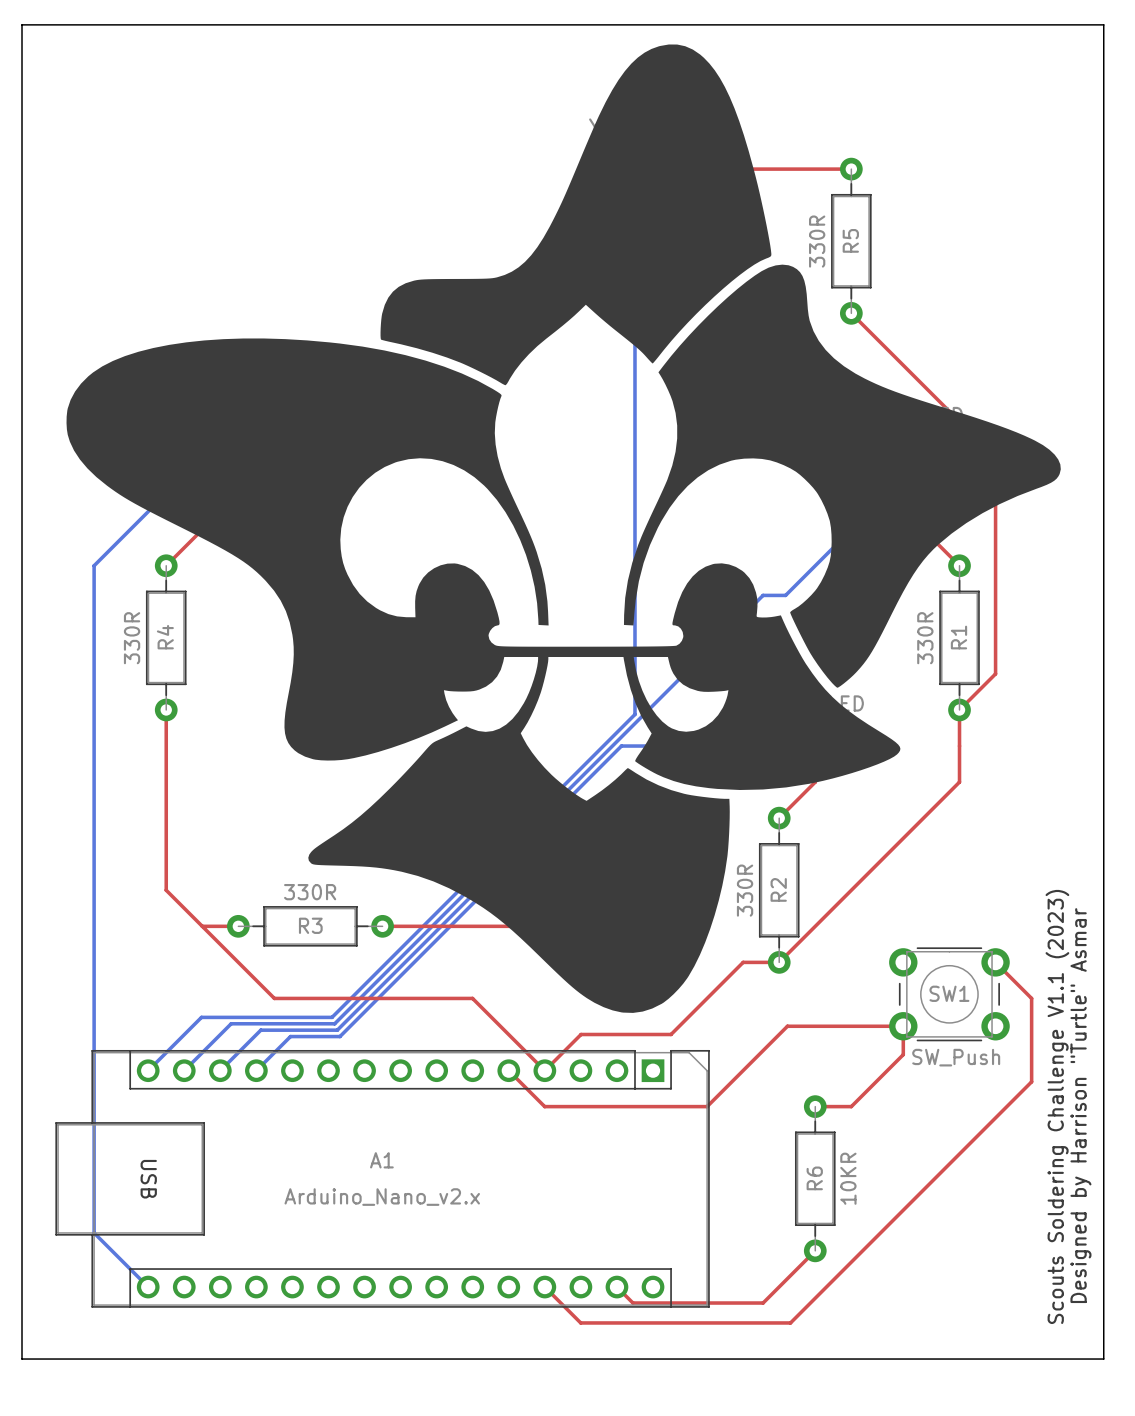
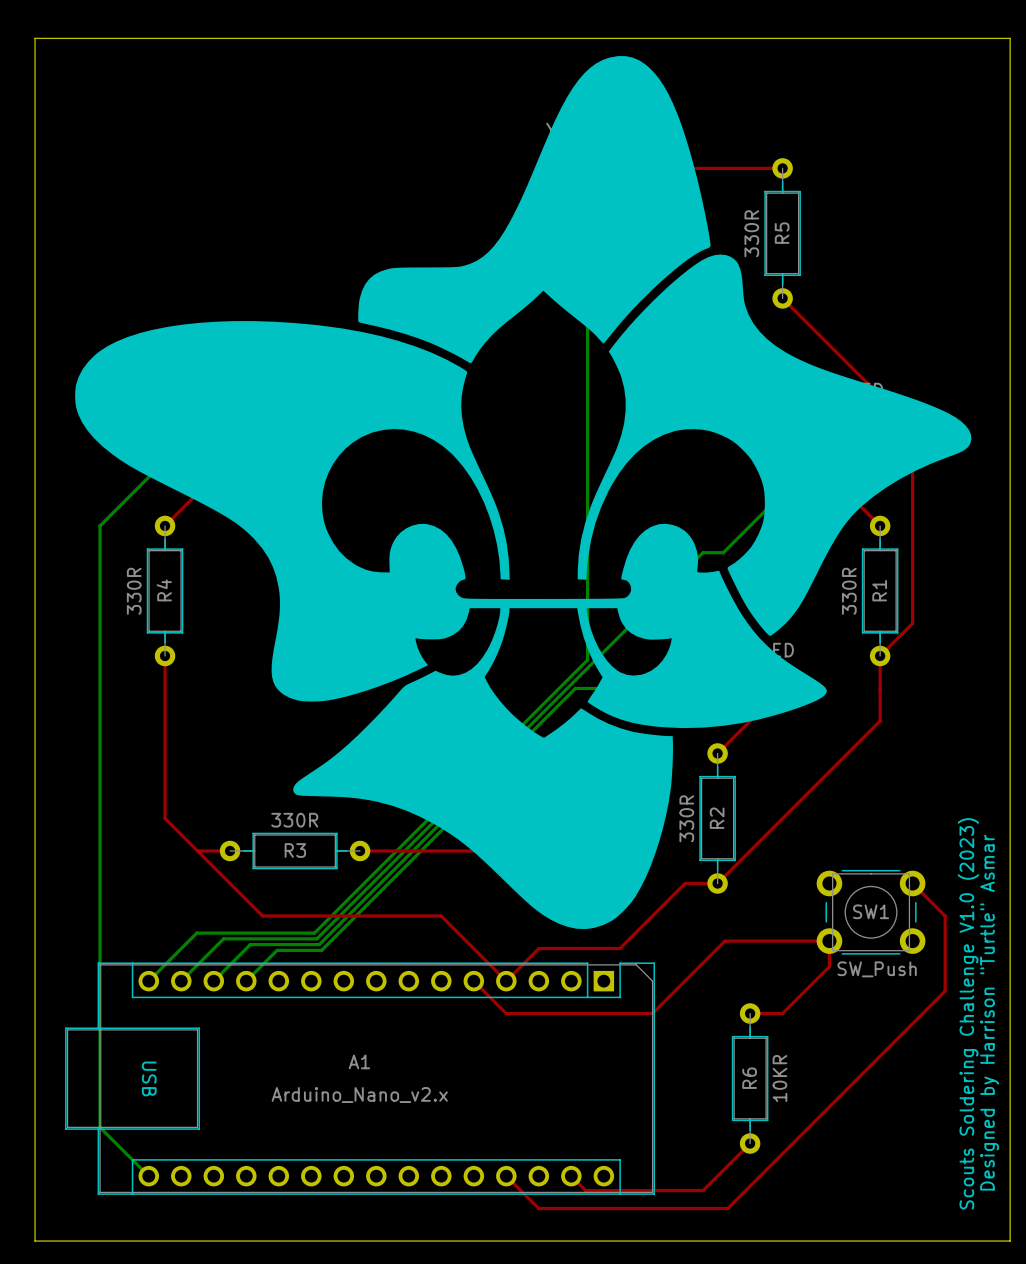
text: Scouts Soldering Challenge V1.1 (2023) (1057, 1106) -> Scouts Soldering Challenge V1.0 (2023) (968, 1013)

